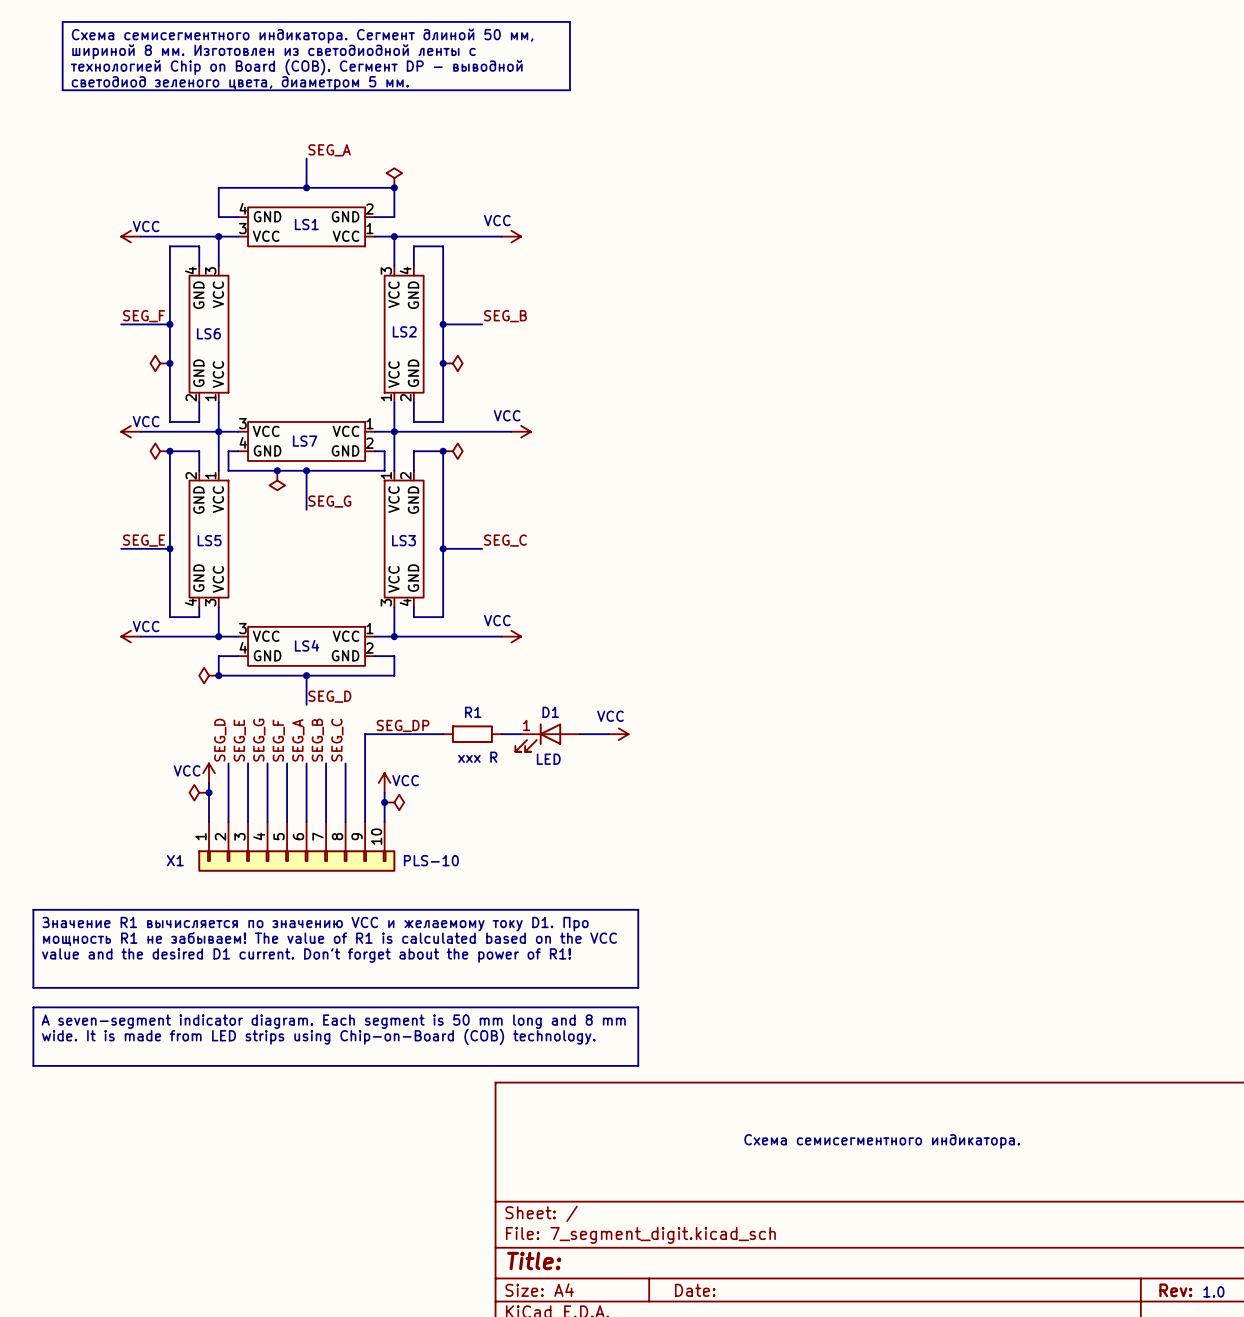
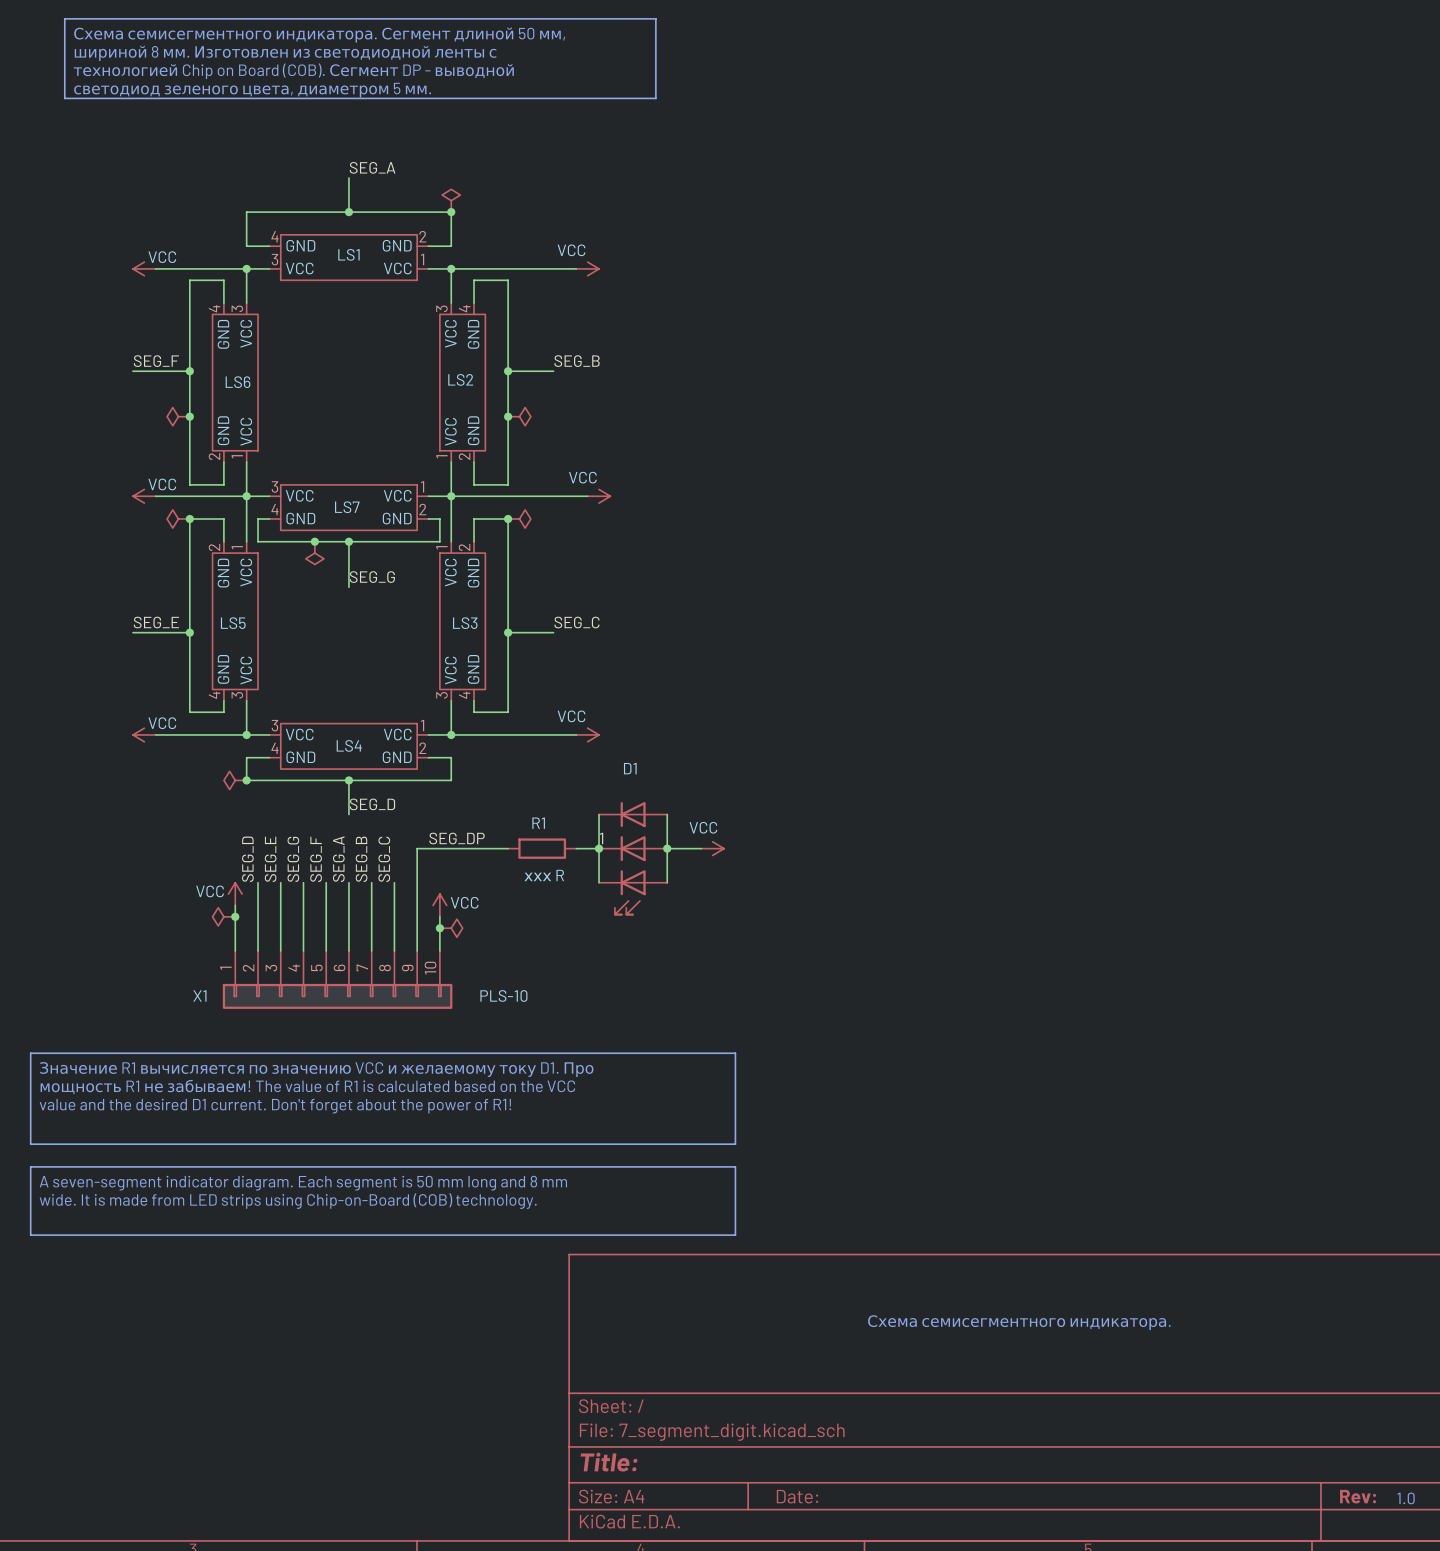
wire: none -> (599, 814) (599, 882)
wire: none -> (667, 814) (667, 882)
D1 name position: D1 (550, 712) -> D1 (630, 768)
D1 symbol: [515, 723, 580, 752] -> [599, 802, 668, 915]
junction: none -> (599, 848)
junction: none -> (667, 848)
D1 value: LED (548, 759) -> none

